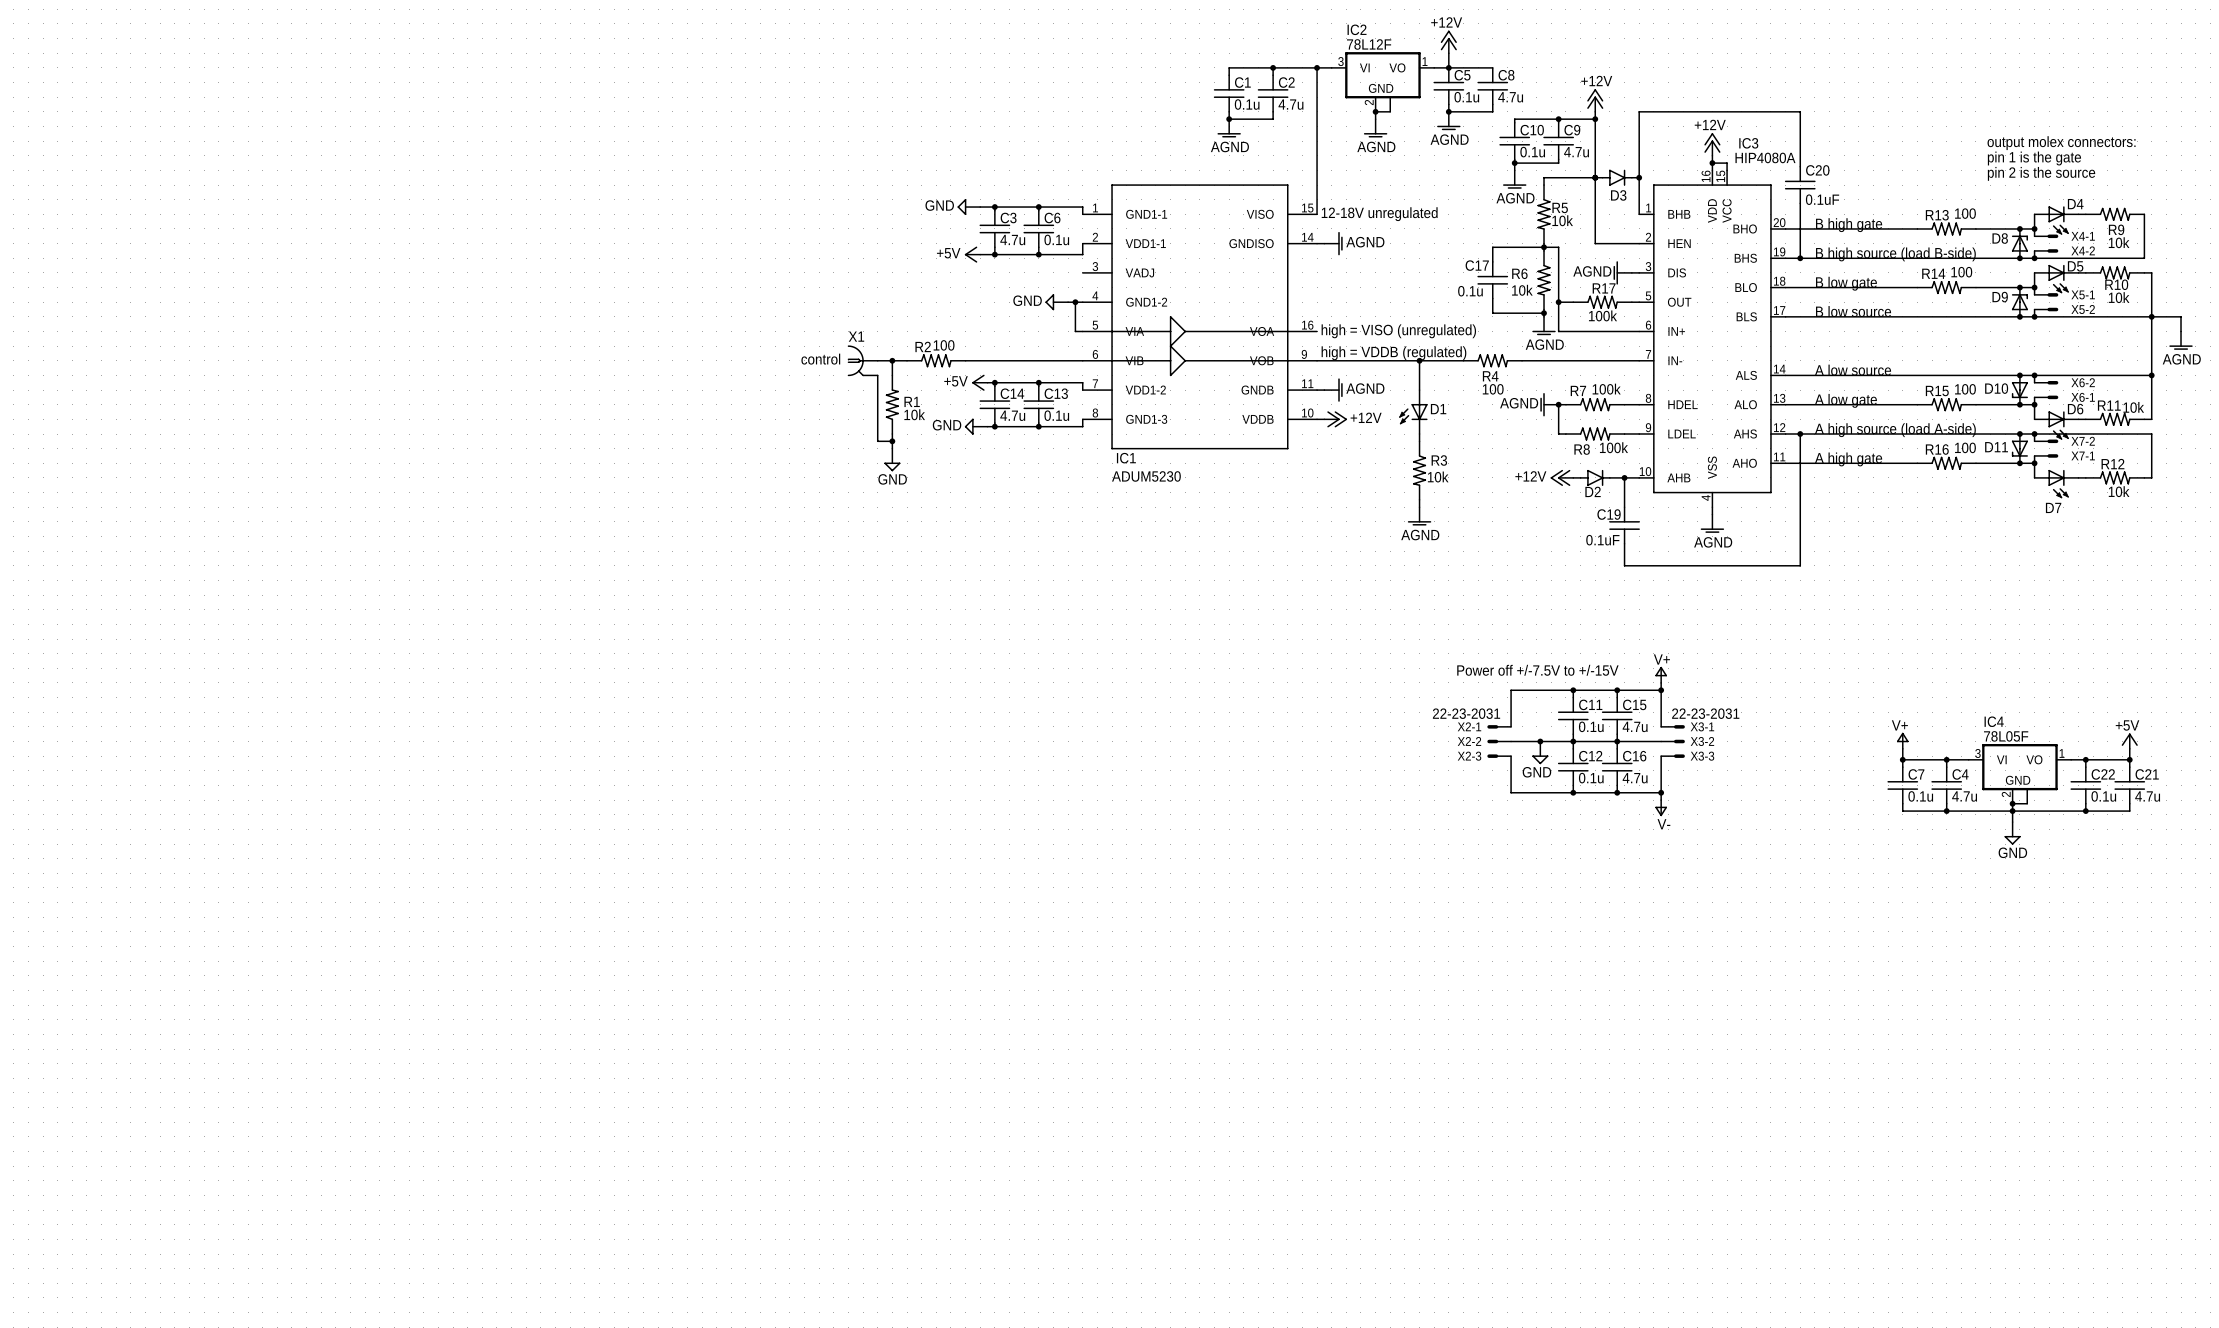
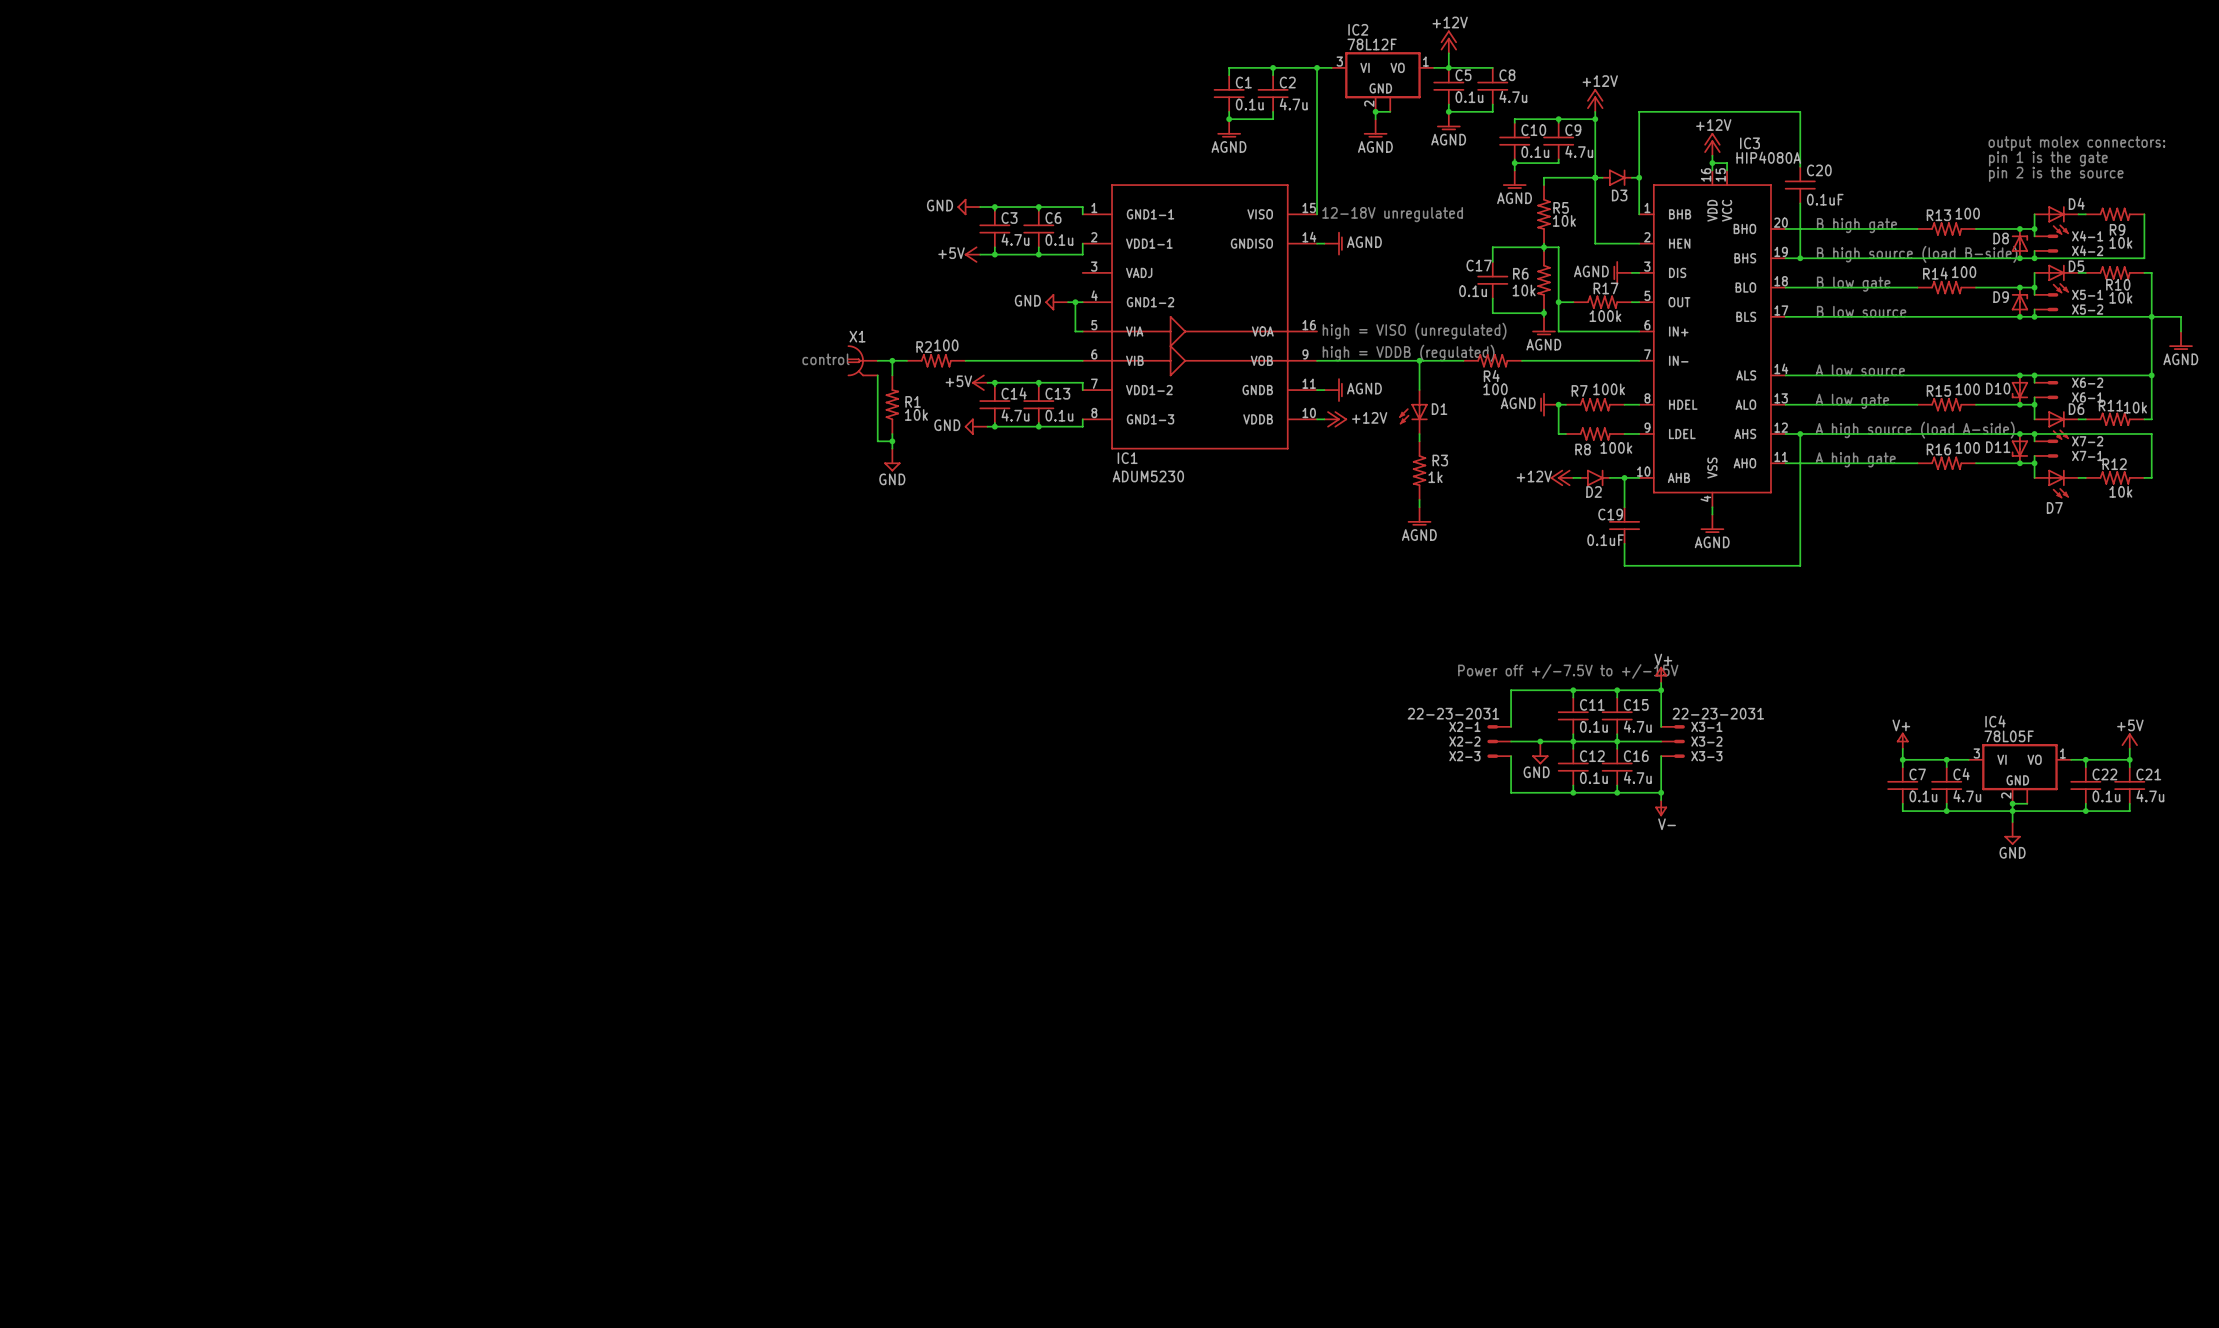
R3 value: 10k (1438, 476) -> 1k (1435, 477)

